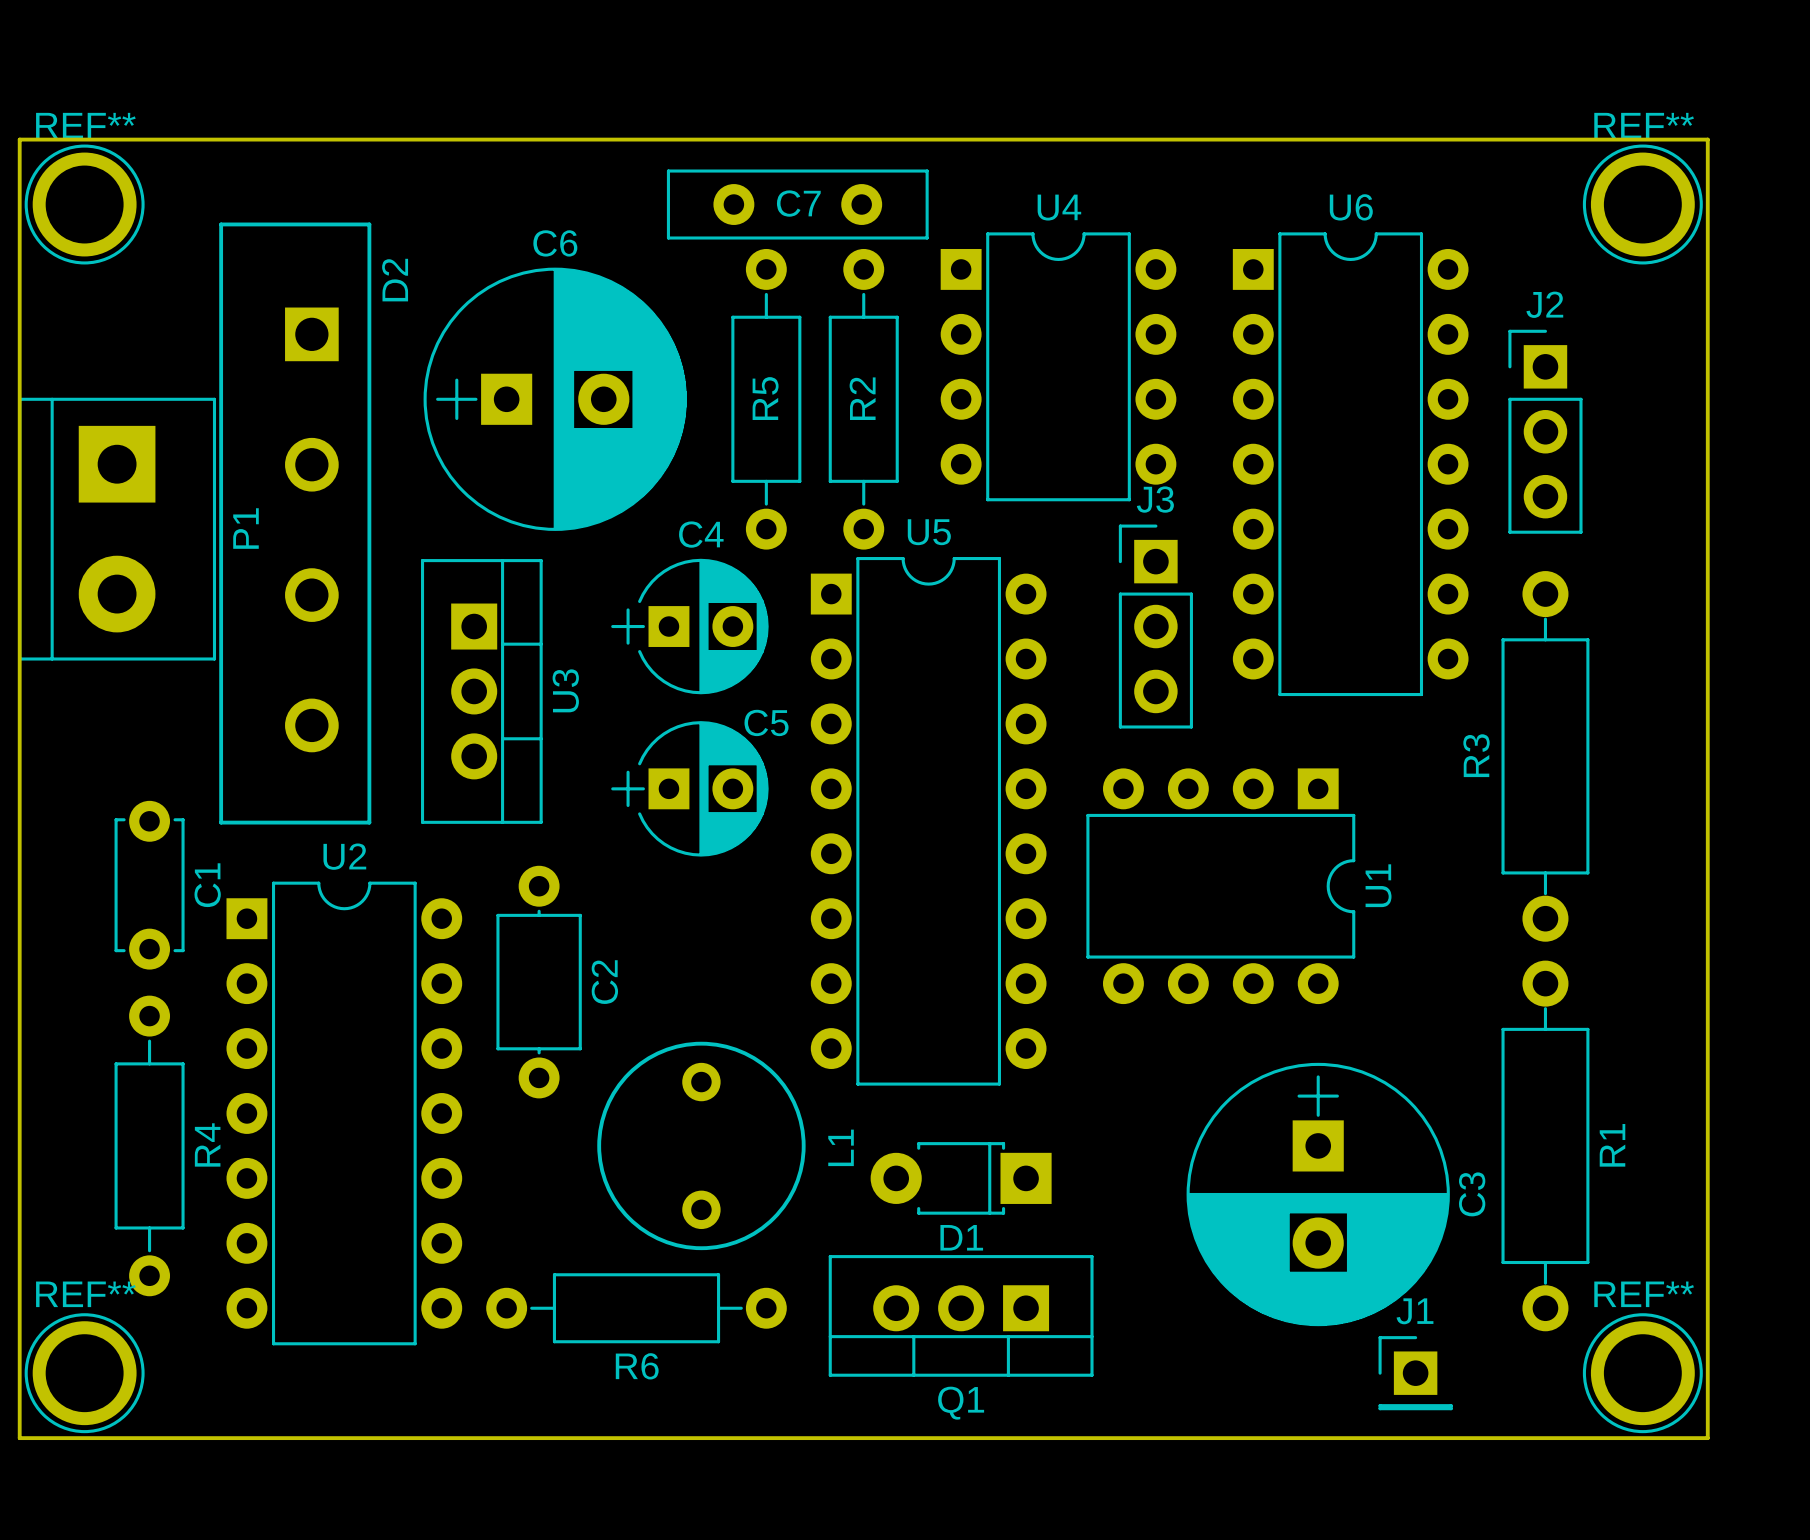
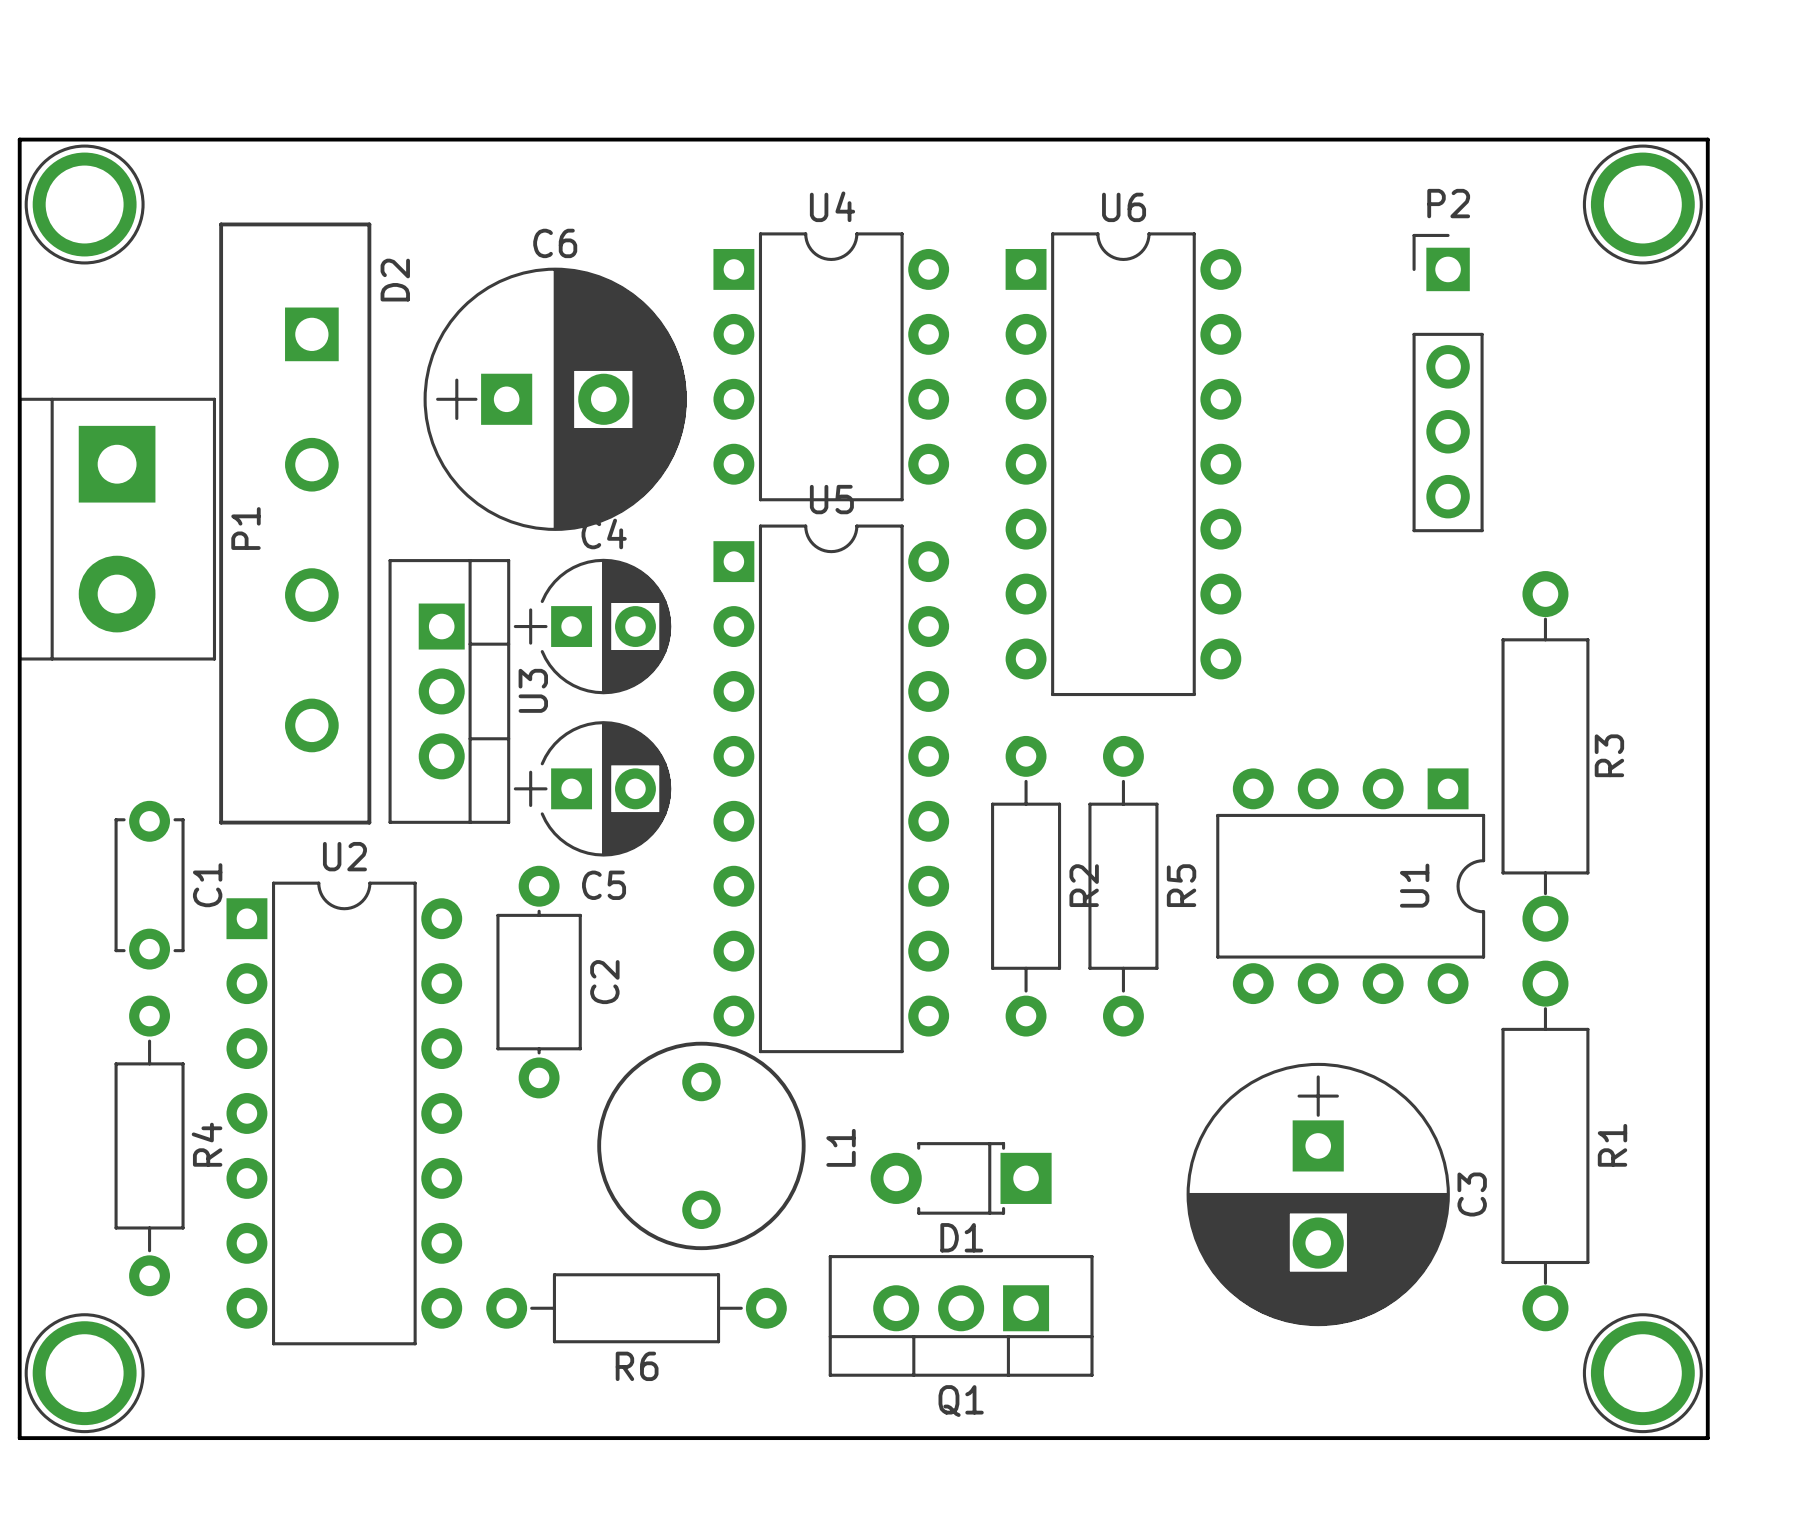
REF** name: REF** (85, 125) -> none
REF** name: REF** (1644, 125) -> none
C7: (797, 204) -> none
U4 position: (1058, 366) -> (831, 366)
P2: none -> (1448, 383)
R5 name position: R5 (765, 398) -> R5 (1181, 885)
R2 name position: R2 (862, 398) -> R2 (1084, 885)
R2 position: (766, 399) -> (1026, 886)
R5 position: (863, 399) -> (1123, 886)
J2: (1545, 431) -> none
U6 position: (1350, 464) -> (1123, 464)
C4 position: (689, 626) -> (592, 626)
J3: (1155, 626) -> none
U3 position: (481, 691) -> (449, 691)
C5 name position: C5 (766, 722) -> C5 (604, 885)
R3 name position: R3 (1476, 755) -> R3 (1609, 755)
C5 position: (689, 788) -> (592, 788)
U5 position: (928, 821) -> (831, 788)
U1 name position: U1 (1378, 885) -> U1 (1414, 885)
U1 position: (1220, 886) -> (1350, 886)
REF** name: REF** (85, 1294) -> none
REF** name: REF** (1644, 1294) -> none
J1: (1415, 1373) -> none

